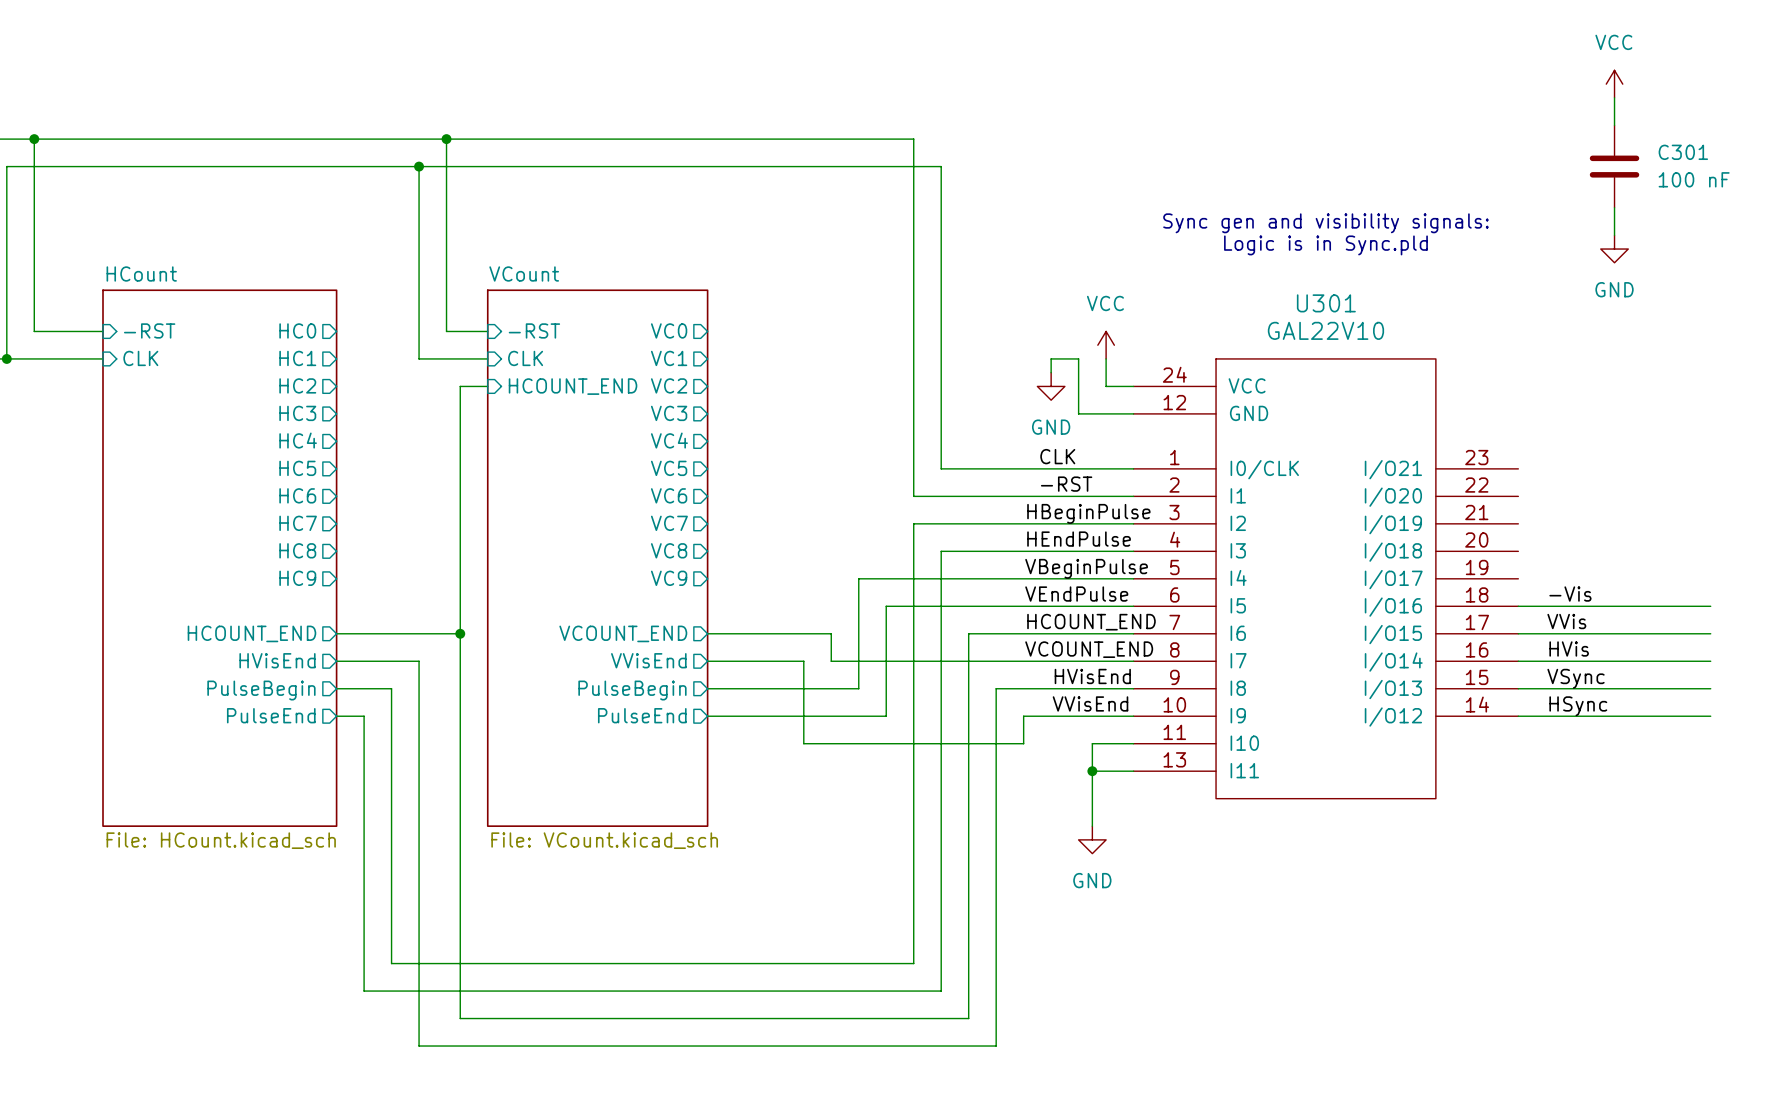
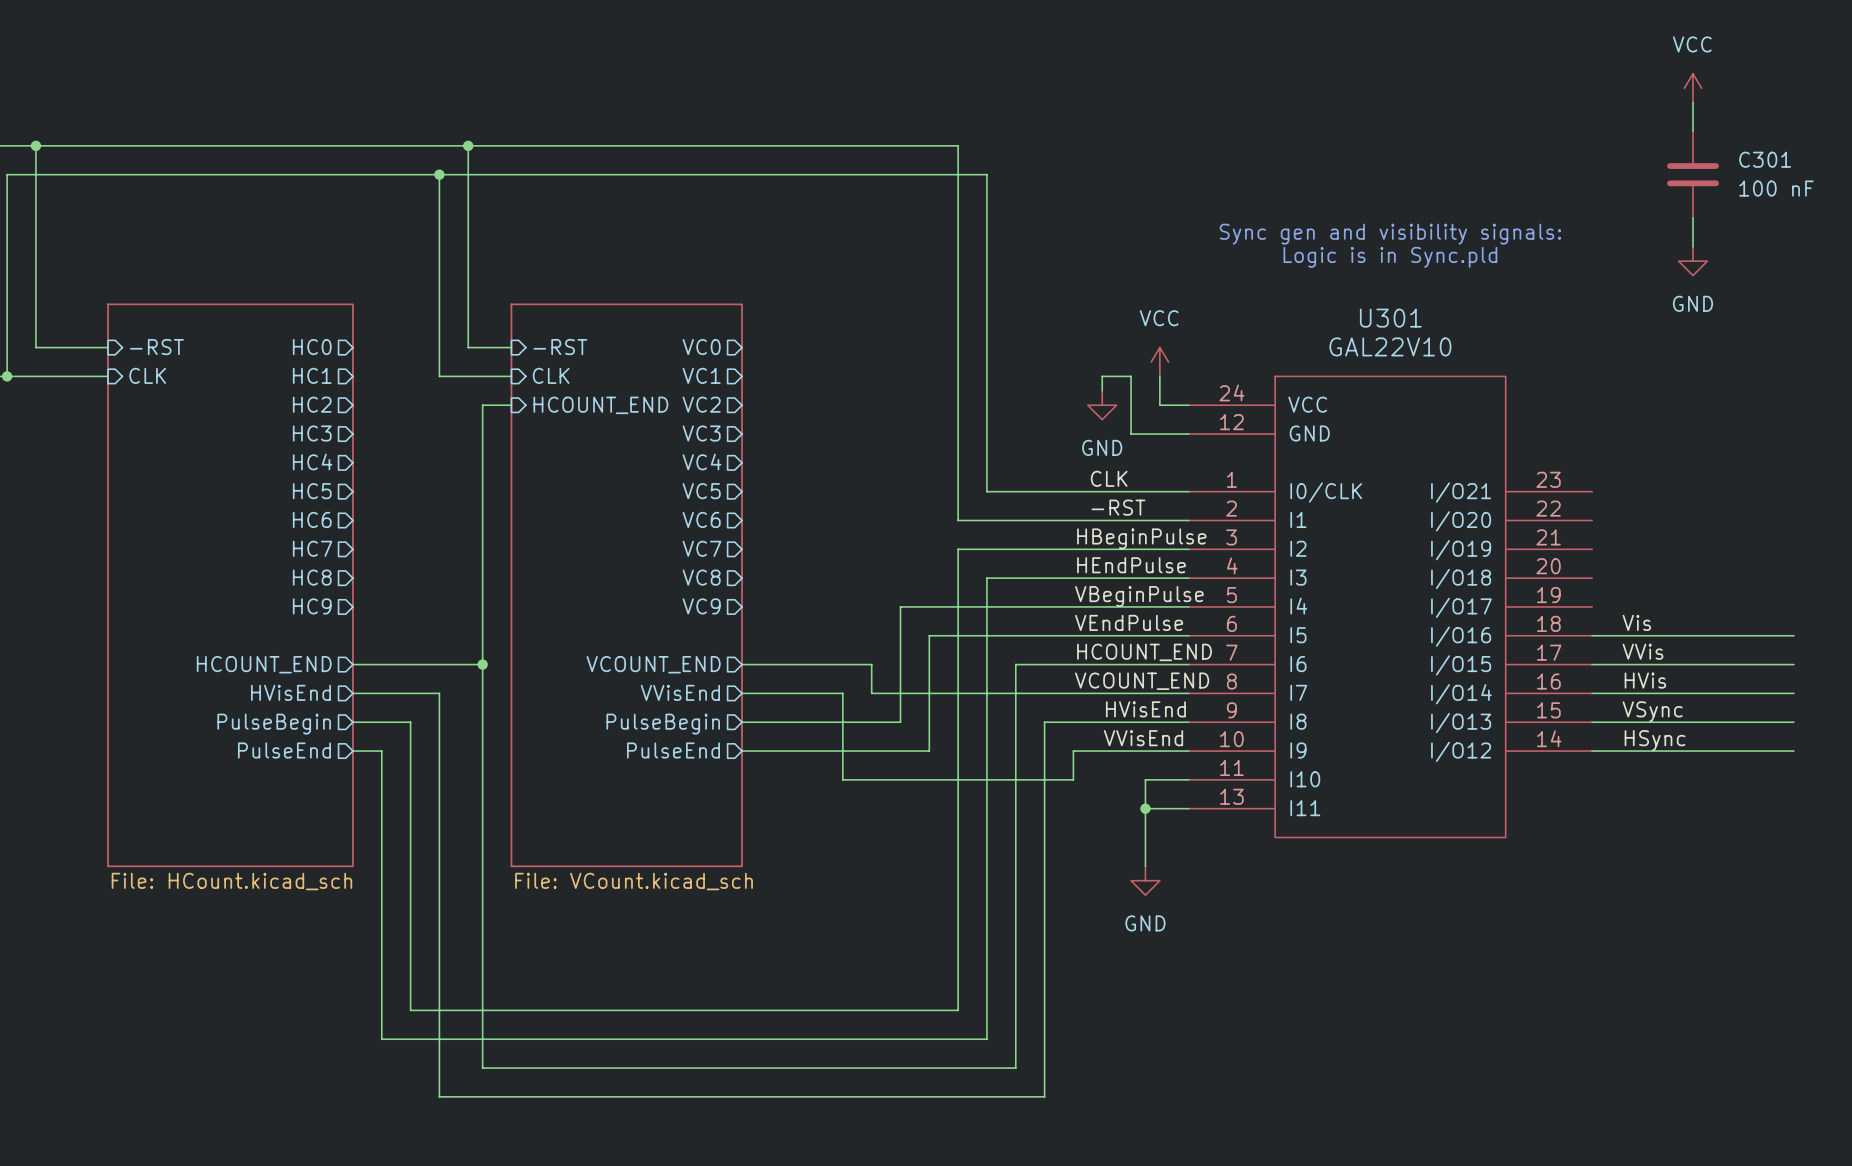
sheet HCount name: HCount (141, 274) -> none
sheet VCount name: VCount (524, 274) -> none
label: -Vis (1570, 594) -> Vis (1636, 622)

